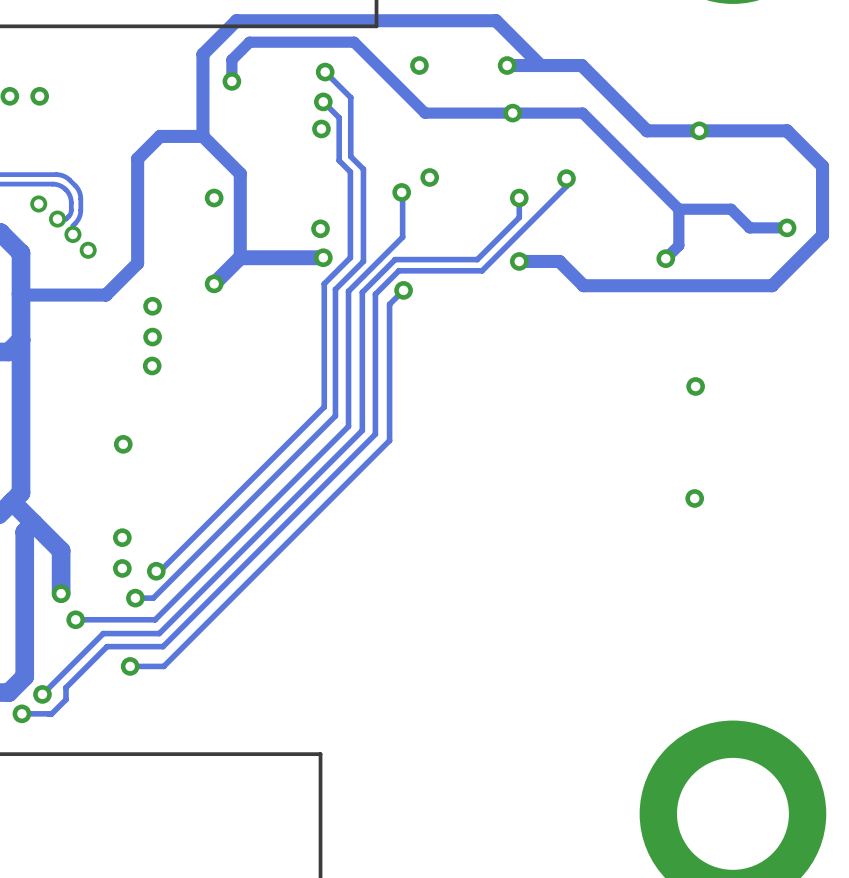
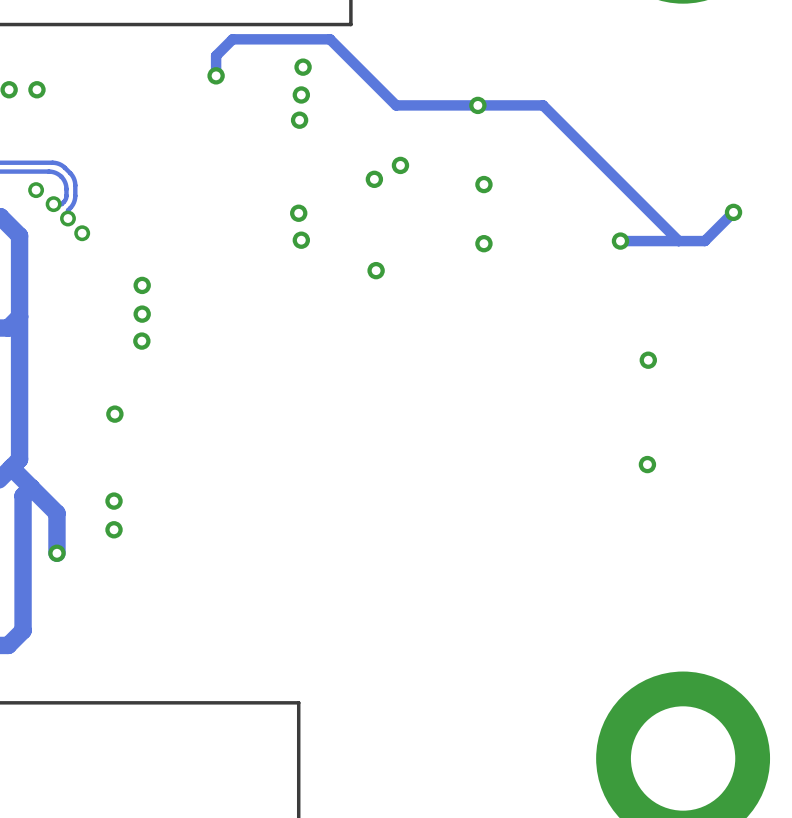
via: (419, 65) -> none
track: (507, 65) (581, 65) (647, 130) (787, 130) (822, 166) (822, 235) (772, 285) (583, 285) (559, 261) (519, 261) -> none
via: (507, 65) -> none
track: (540, 65) (495, 20) (236, 20) (202, 54) (202, 136) -> none
track: (325, 72) (350, 97) (350, 156) (363, 169) (363, 261) (335, 289) (335, 415) (153, 598) (135, 598) -> none
track: (323, 101) (339, 117) (339, 160) (350, 171) (350, 257) (324, 283) (324, 407) (160, 571) (156, 571) -> none
via: (699, 130) -> none
track: (202, 136) (160, 136) (137, 158) (137, 263) (105, 295) (21, 294) -> none
track: (202, 136) (240, 173) (240, 257) -> none
track: (566, 178) (566, 186) (482, 270) (398, 270) (375, 294) (375, 434) (163, 646) (107, 646) (65, 687) (65, 699) (49, 714) -> none
via: (566, 178) -> none
track: (401, 192) (402, 237) (348, 291) (348, 426) (155, 619) (75, 619) -> none
via: (214, 198) -> none
track: (519, 198) (519, 217) (477, 259) (395, 259) (362, 292) (362, 430) (159, 633) (103, 633) (42, 694) -> none
track: none -> (632, 194) (678, 241)
track: (787, 227) (749, 227) (731, 209) (678, 209) (678, 245) (665, 258) -> (733, 212) (704, 241) (620, 241)
track: (240, 257) (214, 283) -> none
track: (323, 257) (240, 257) -> none
via: (214, 283) -> none
track: (403, 290) (389, 304) (389, 440) (163, 666) (130, 666) -> none
via: (156, 571) -> none
via: (135, 598) -> none
via: (75, 619) -> none
via: (130, 666) -> none
via: (42, 694) -> none
via: (21, 713) -> none
track: (48, 713) (21, 713) -> none

